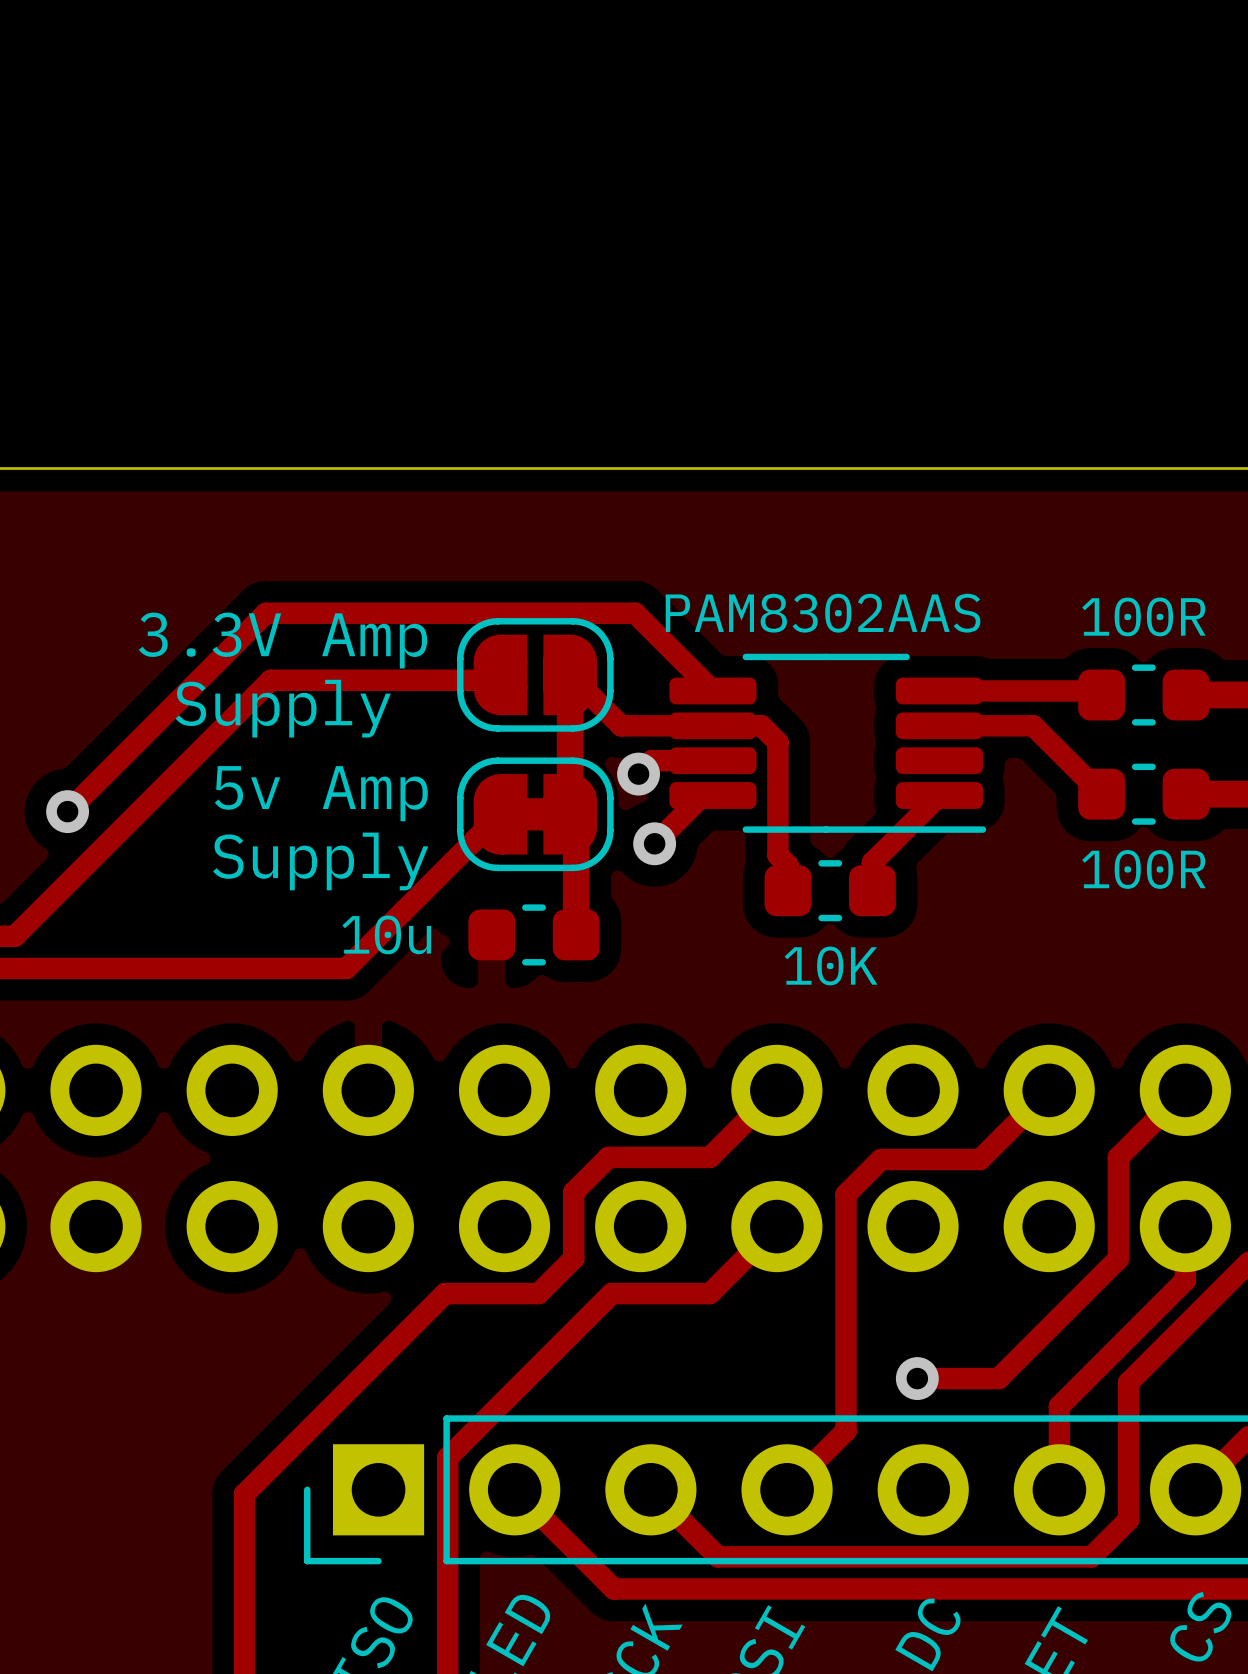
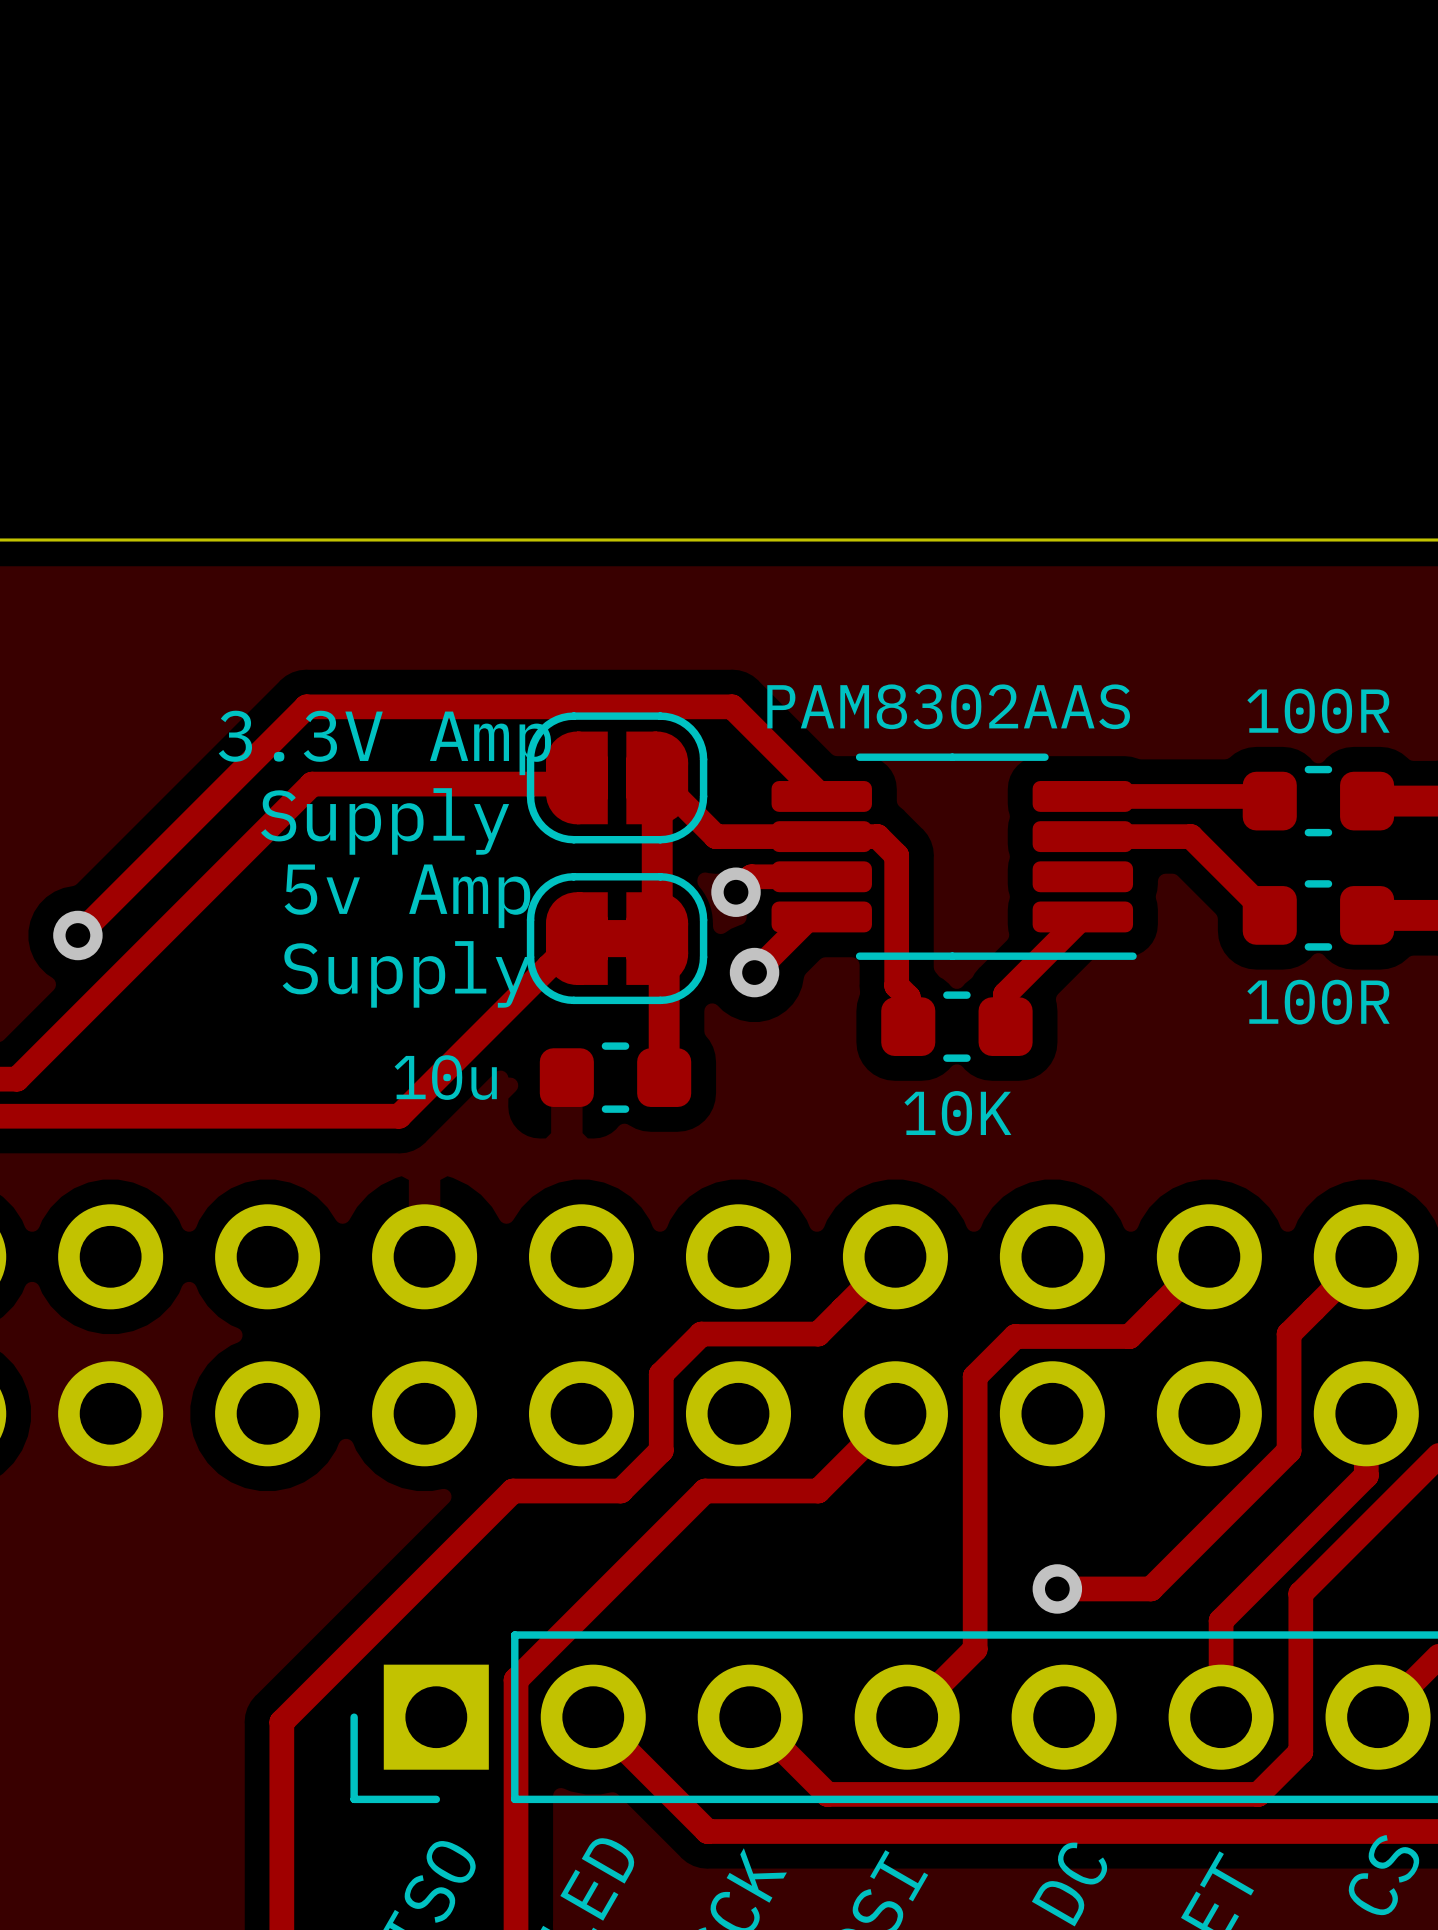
text position: 3.3V Amp (283, 640) -> 3.3V Amp (384, 742)
text position: Supply (283, 708) -> Supply (385, 821)
text position: 5v Amp (321, 793) -> 5v Amp (407, 896)
text position: Supply (320, 861) -> Supply (406, 974)

